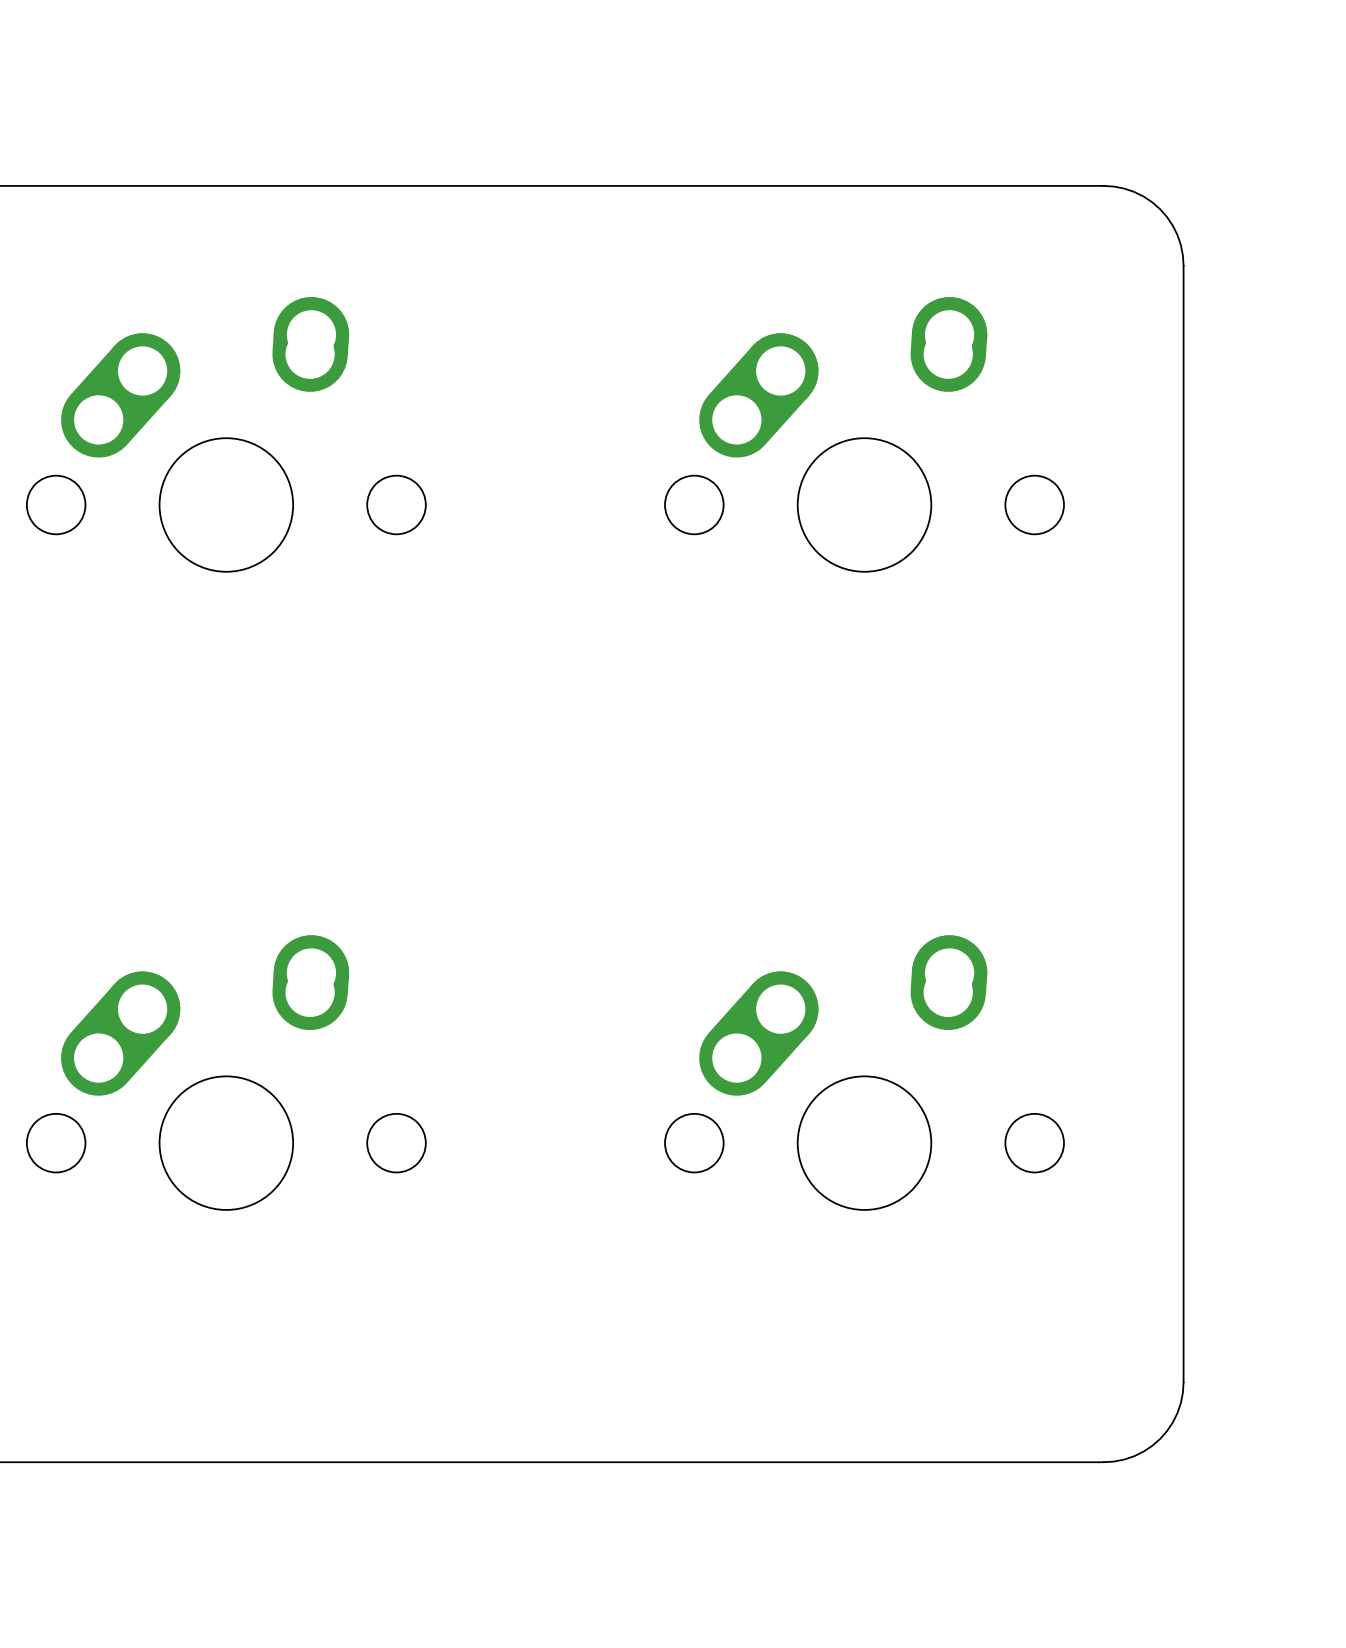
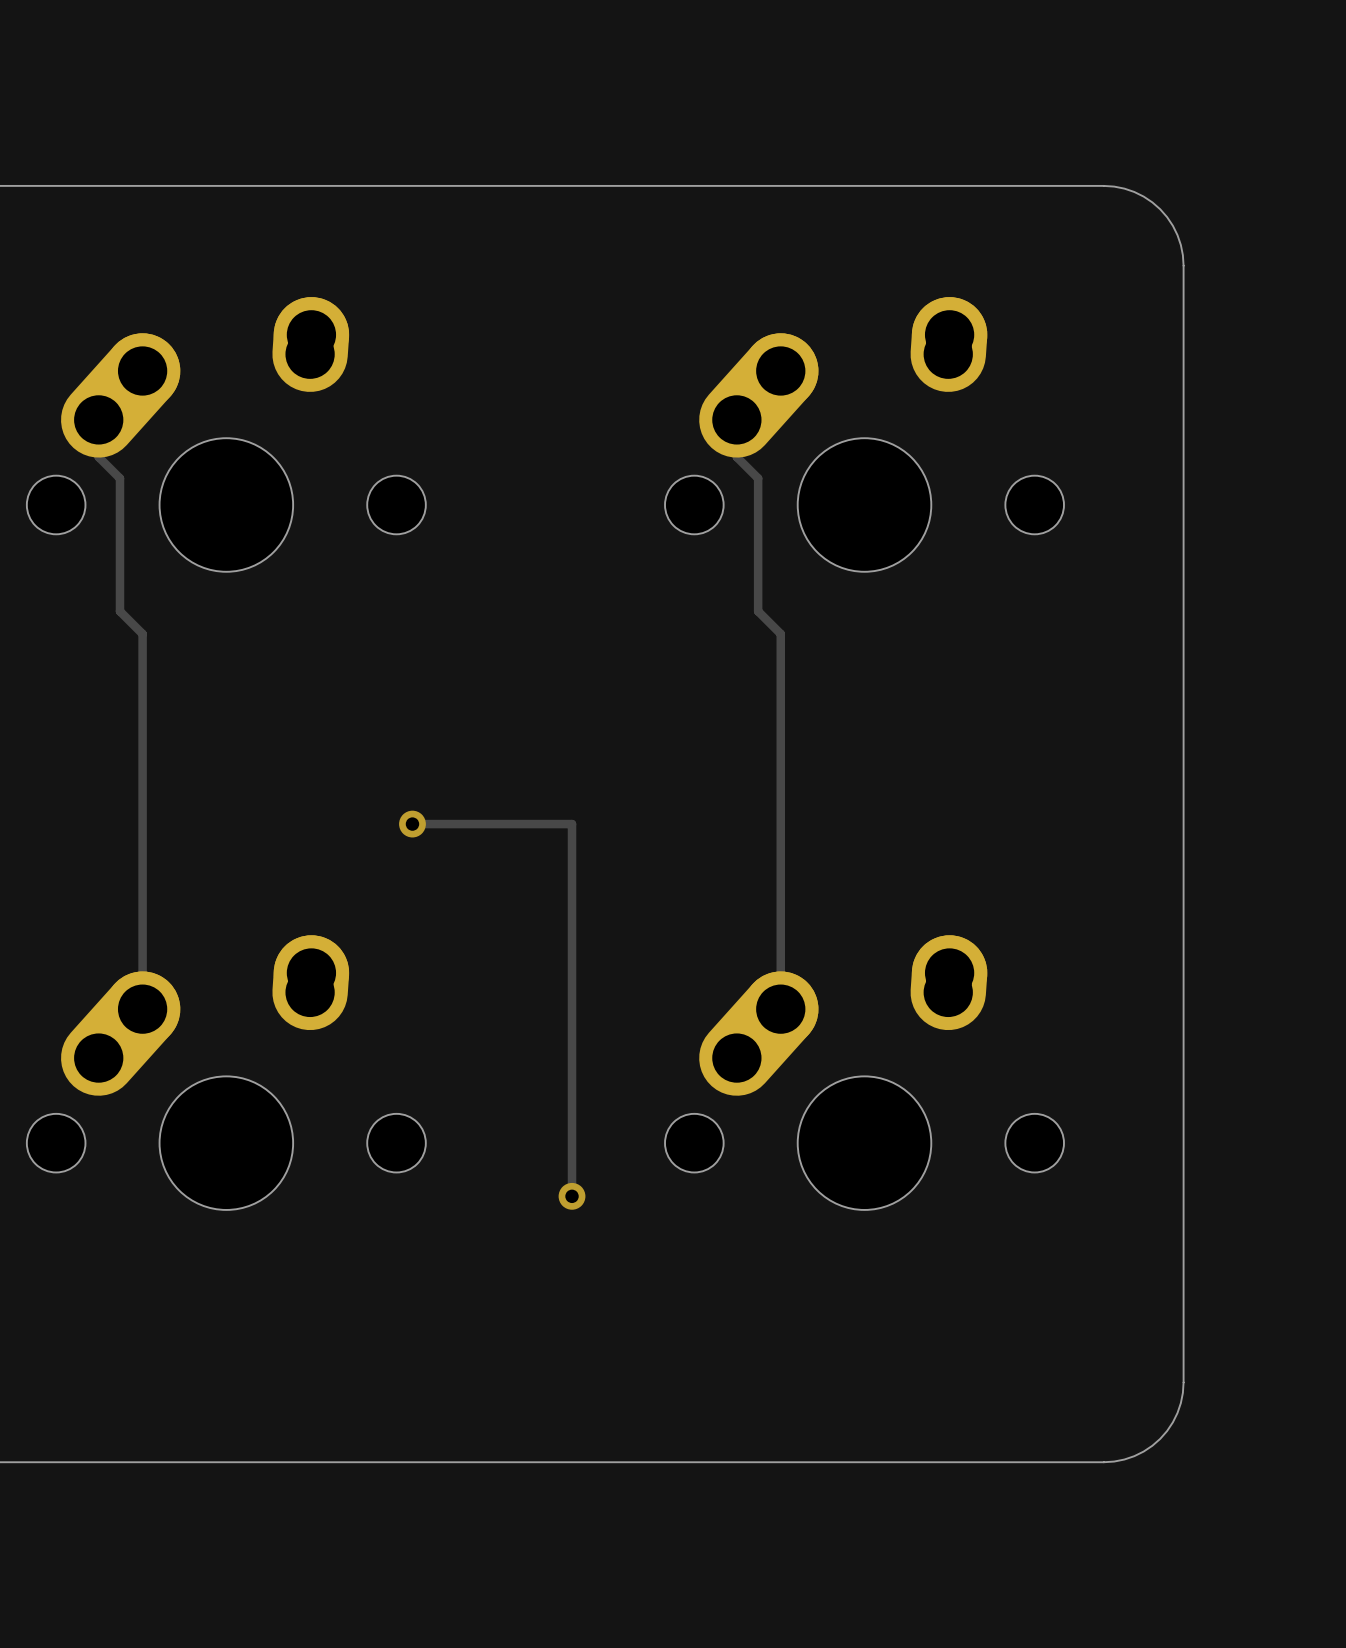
track: none -> (98, 419) (98, 457) (119, 478) (119, 611) (142, 633) (142, 1009)
track: none -> (736, 419) (736, 457) (758, 478) (758, 611) (780, 633) (780, 1009)
track: none -> (412, 824) (572, 824) (572, 1196)
via: none -> (412, 824)
via: none -> (572, 1196)

